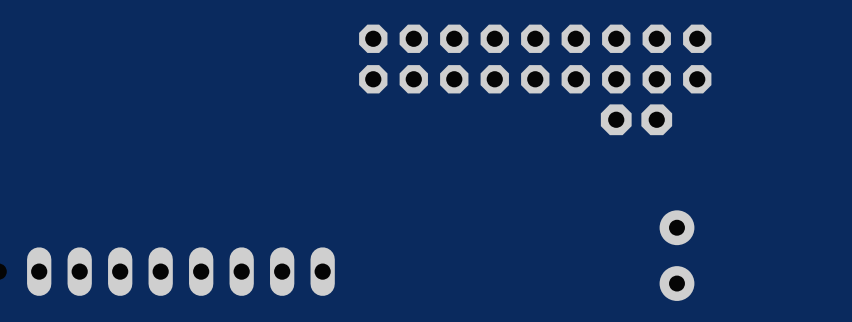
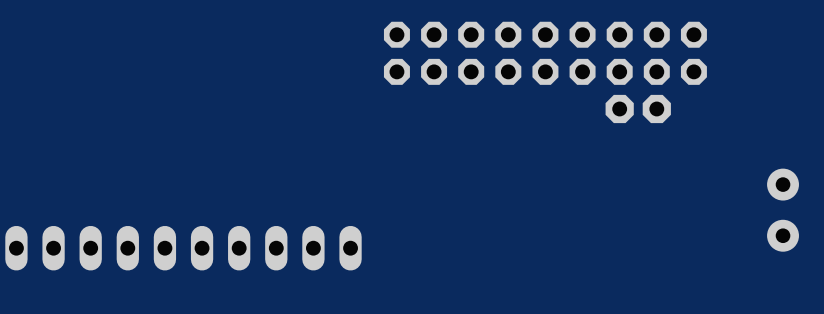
part position: (676, 255) -> (783, 210)

